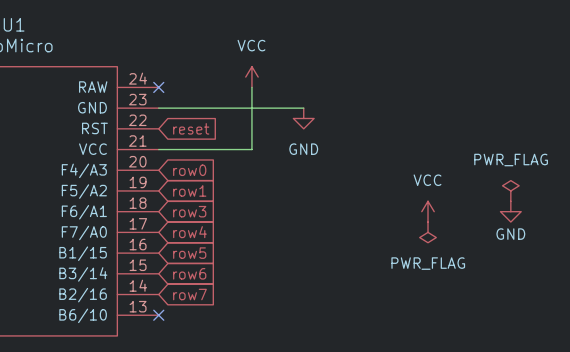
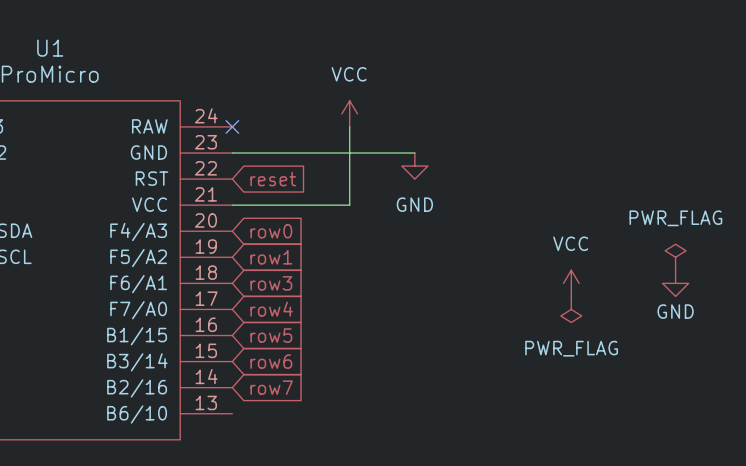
no-connect mark: (158, 315) -> none

